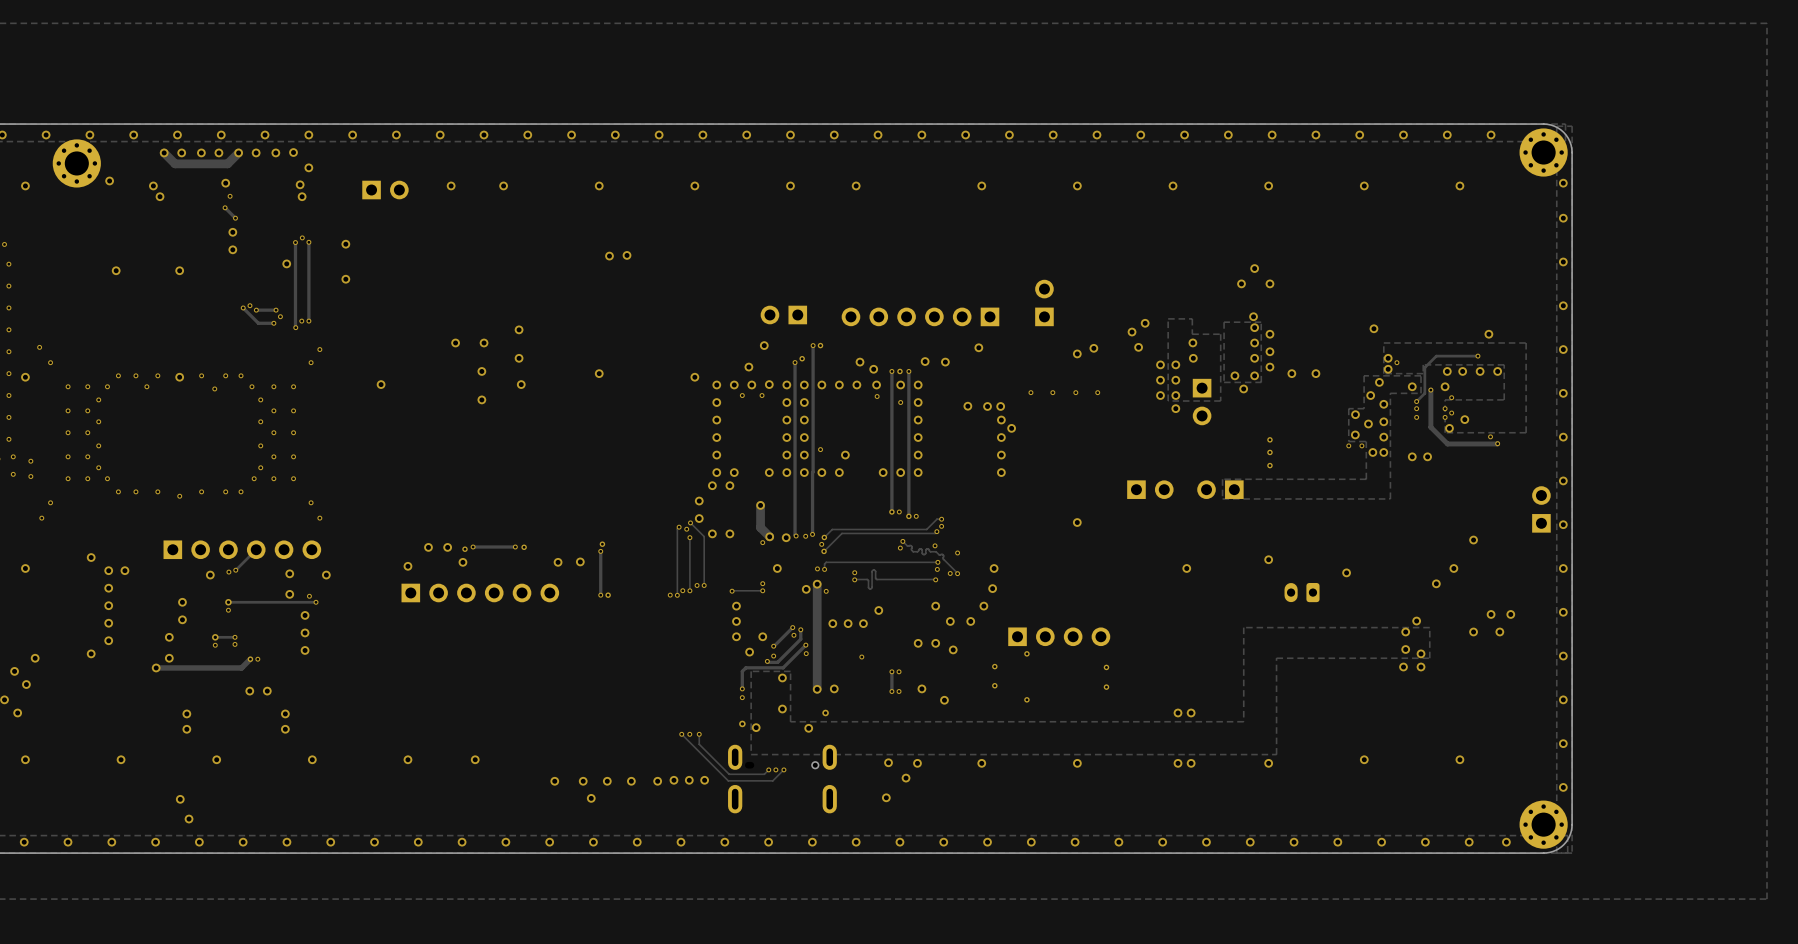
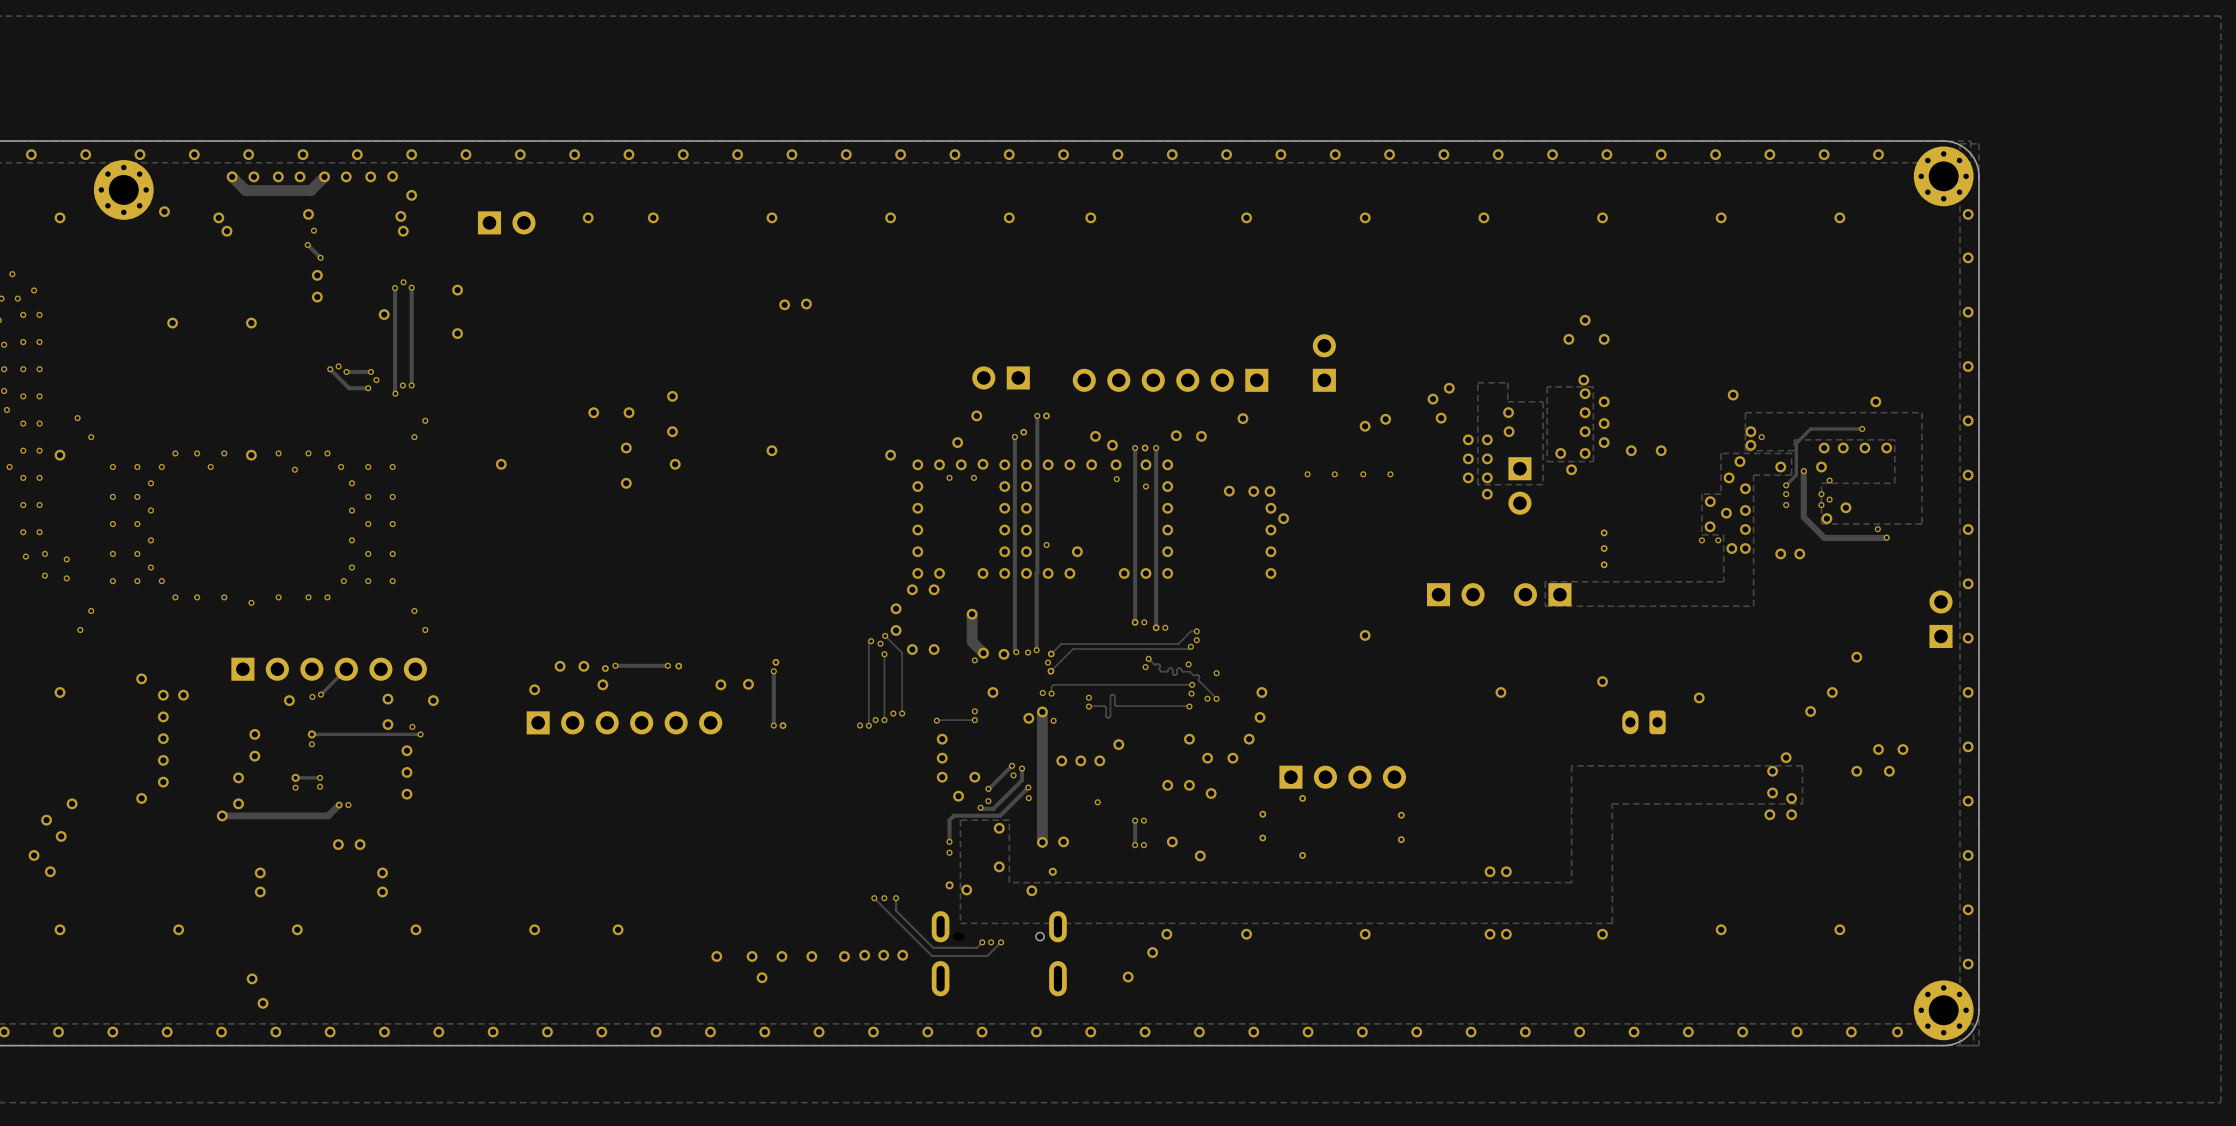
via: (888, 762) -> none

